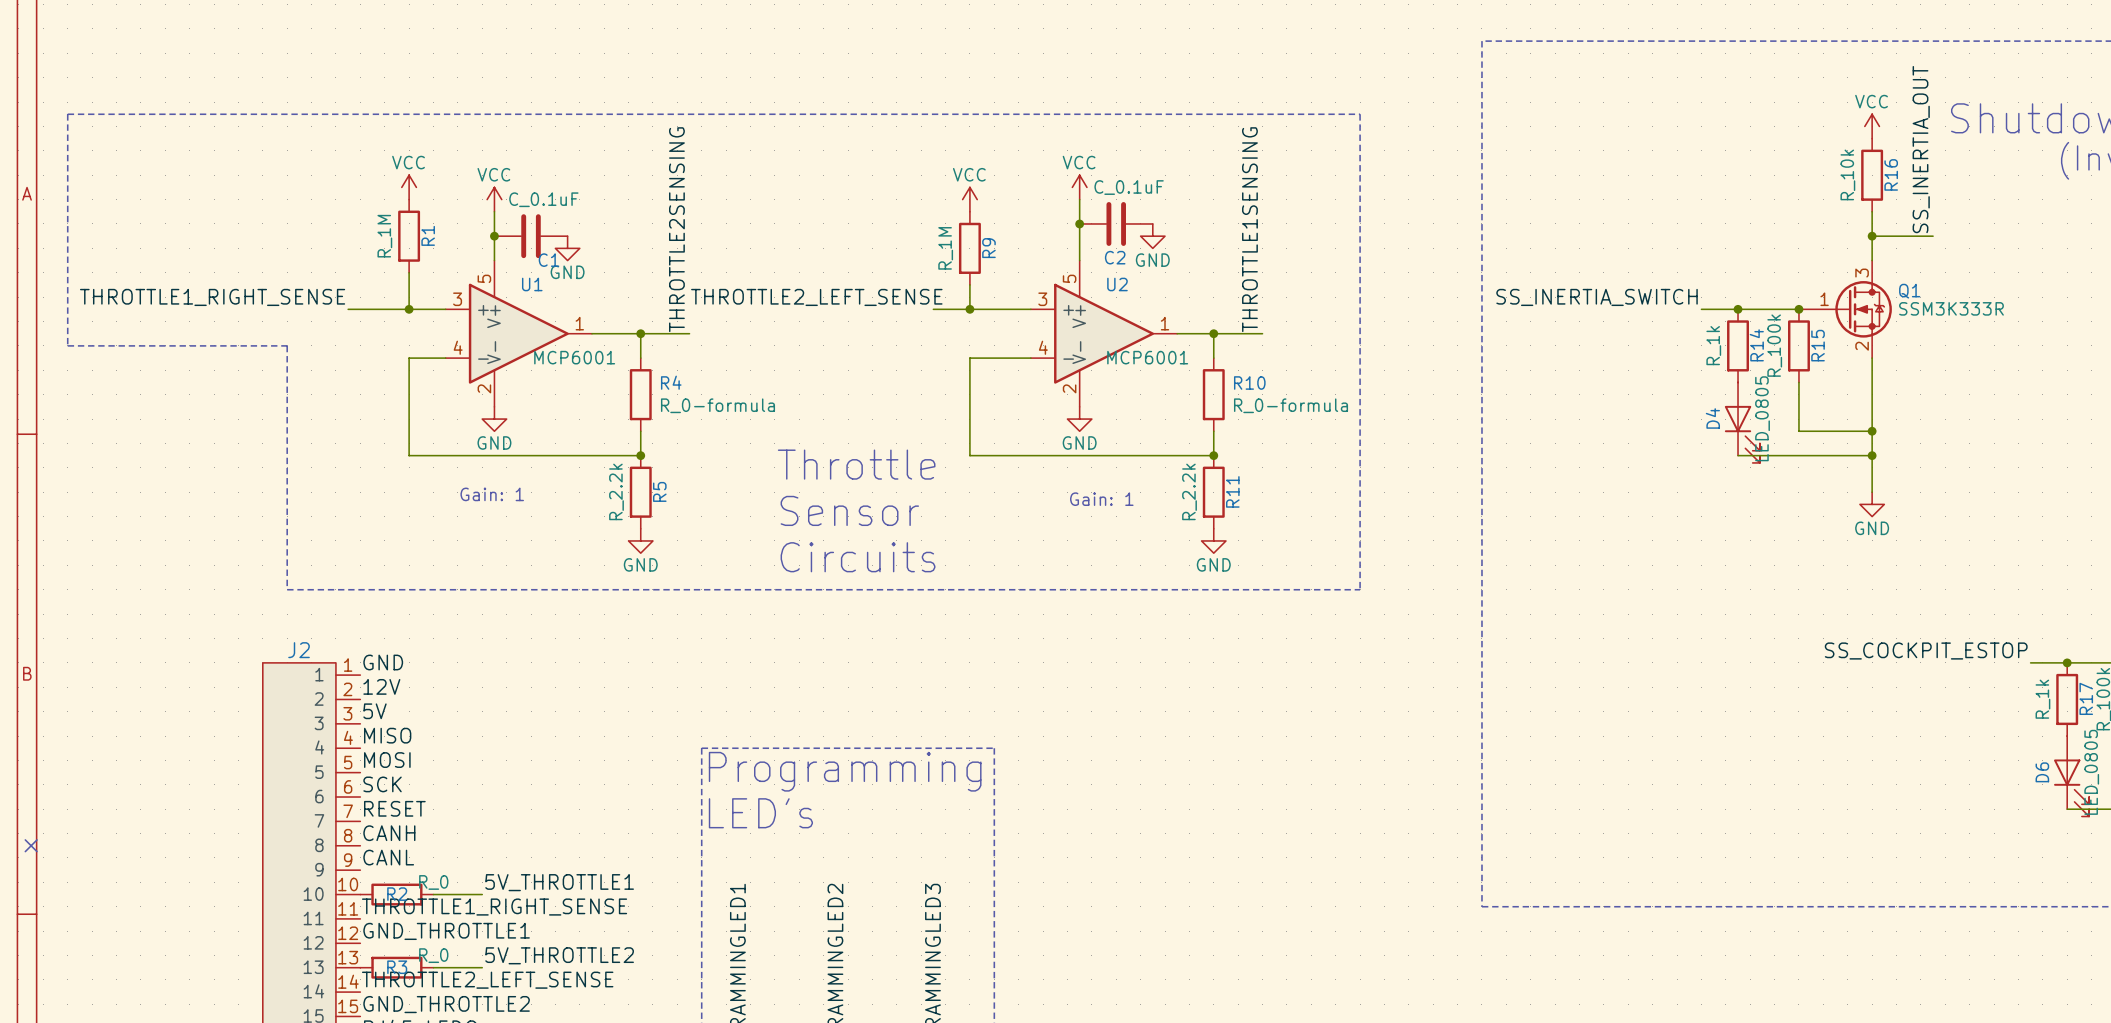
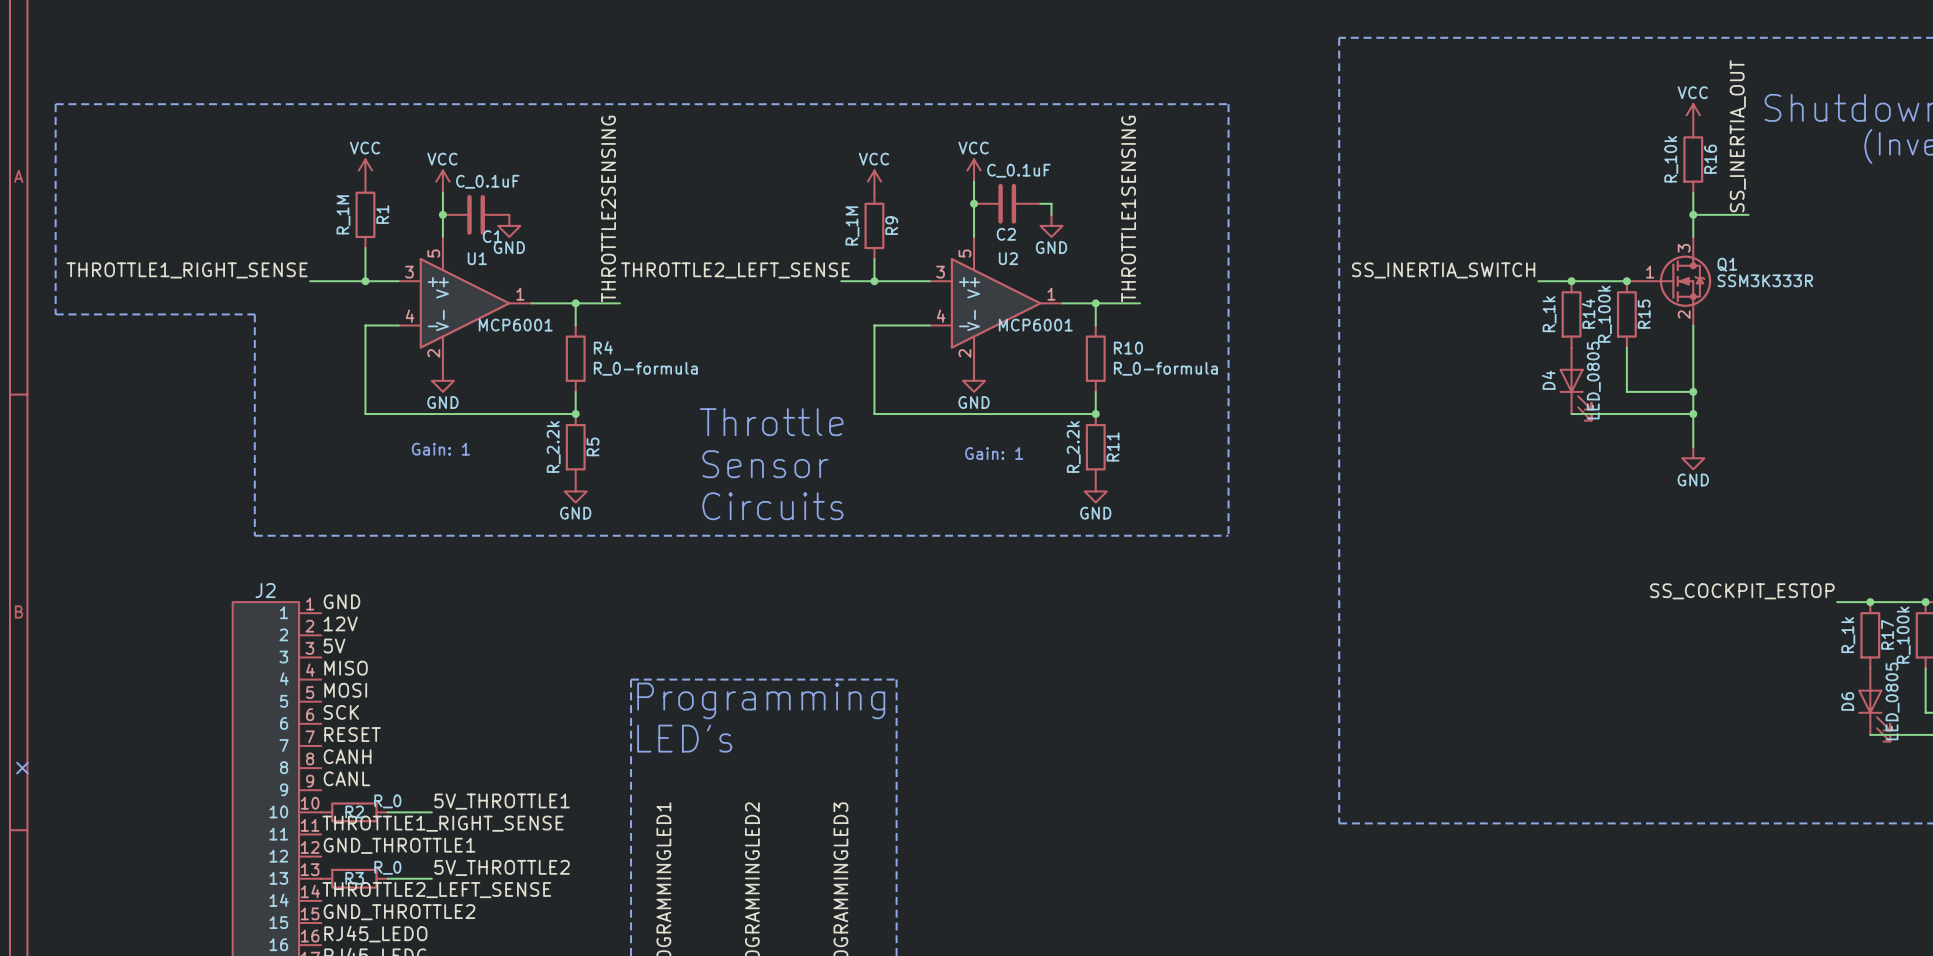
wire: none -> (1040, 203) (1051, 203) (1051, 214)
power symbol position: GND (1152, 236) -> GND (1051, 225)

